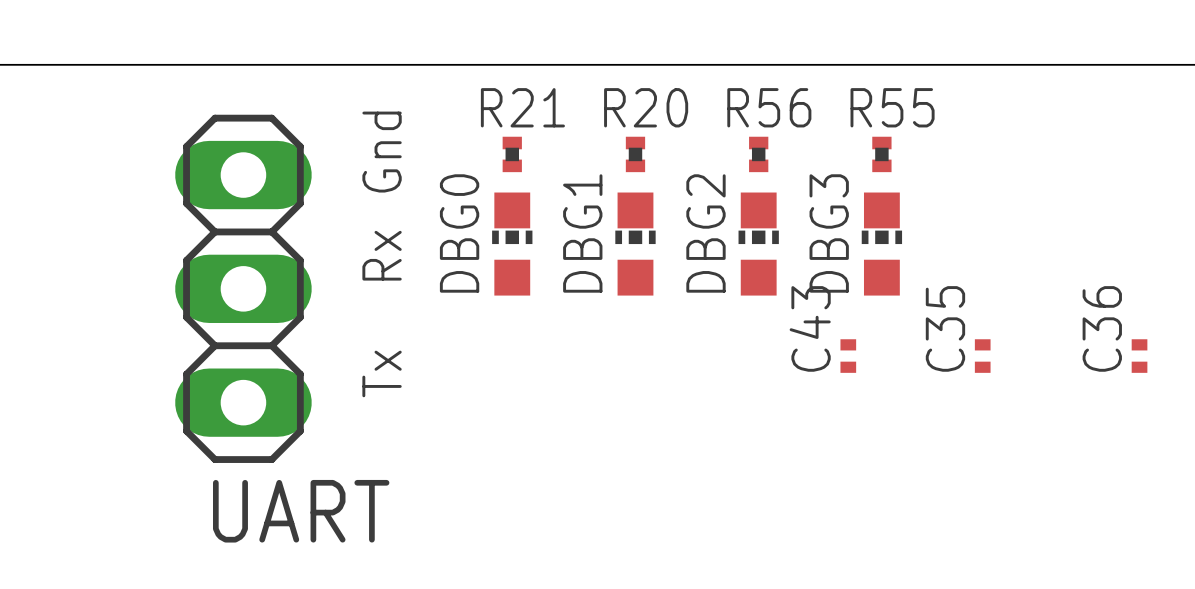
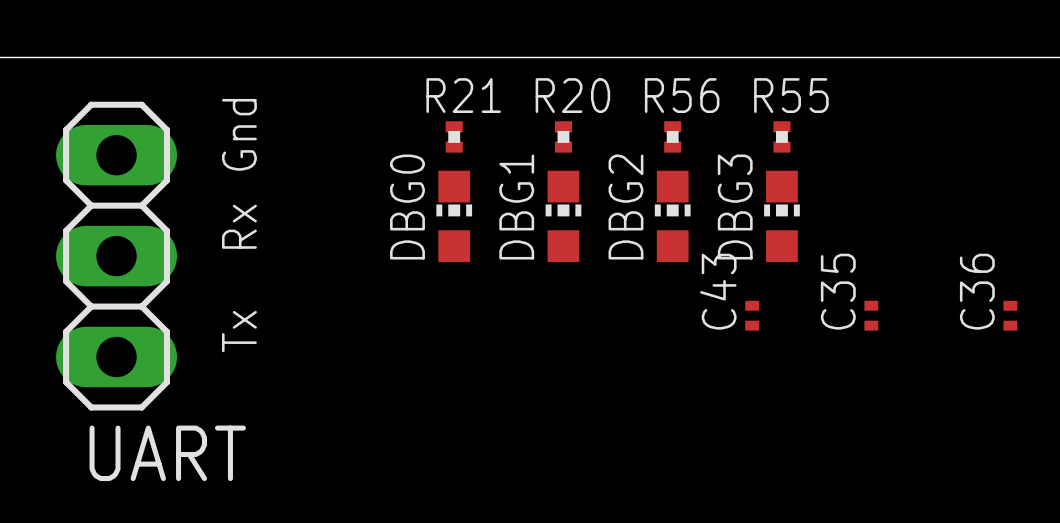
text position: Gnd (382, 152) -> Gnd (239, 134)
text position: Rx (382, 255) -> Rx (239, 226)
UART position: (243, 288) -> (116, 256)
text position: Tx (382, 373) -> Tx (239, 331)

